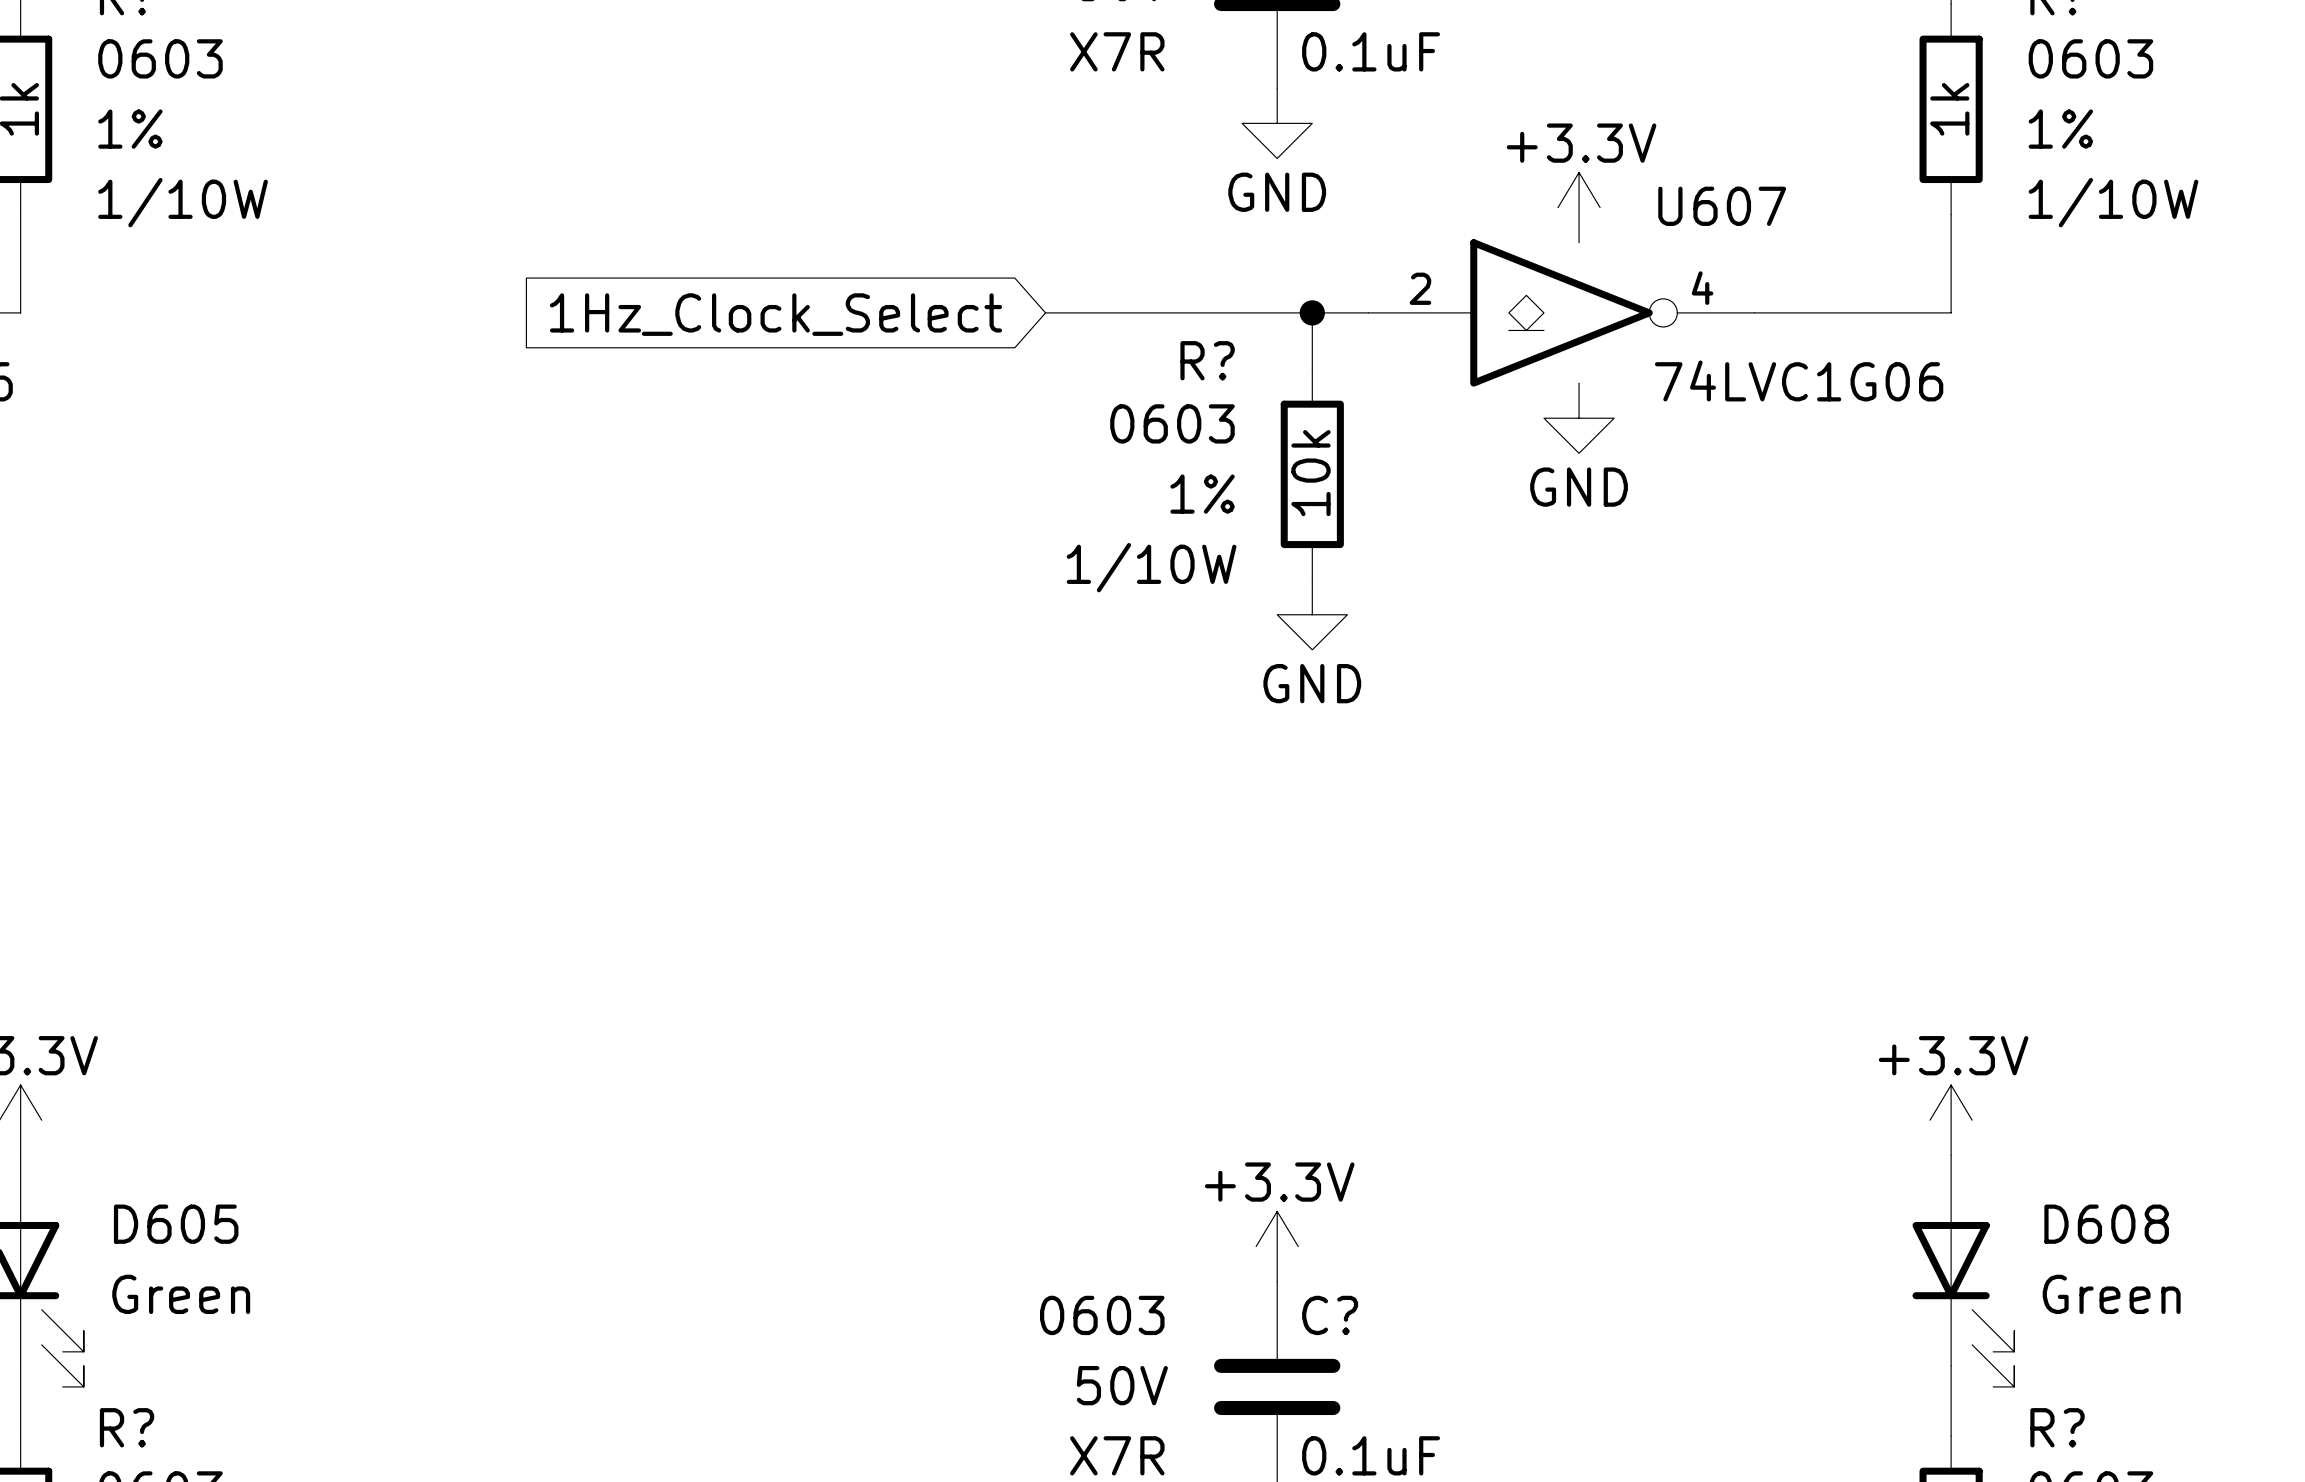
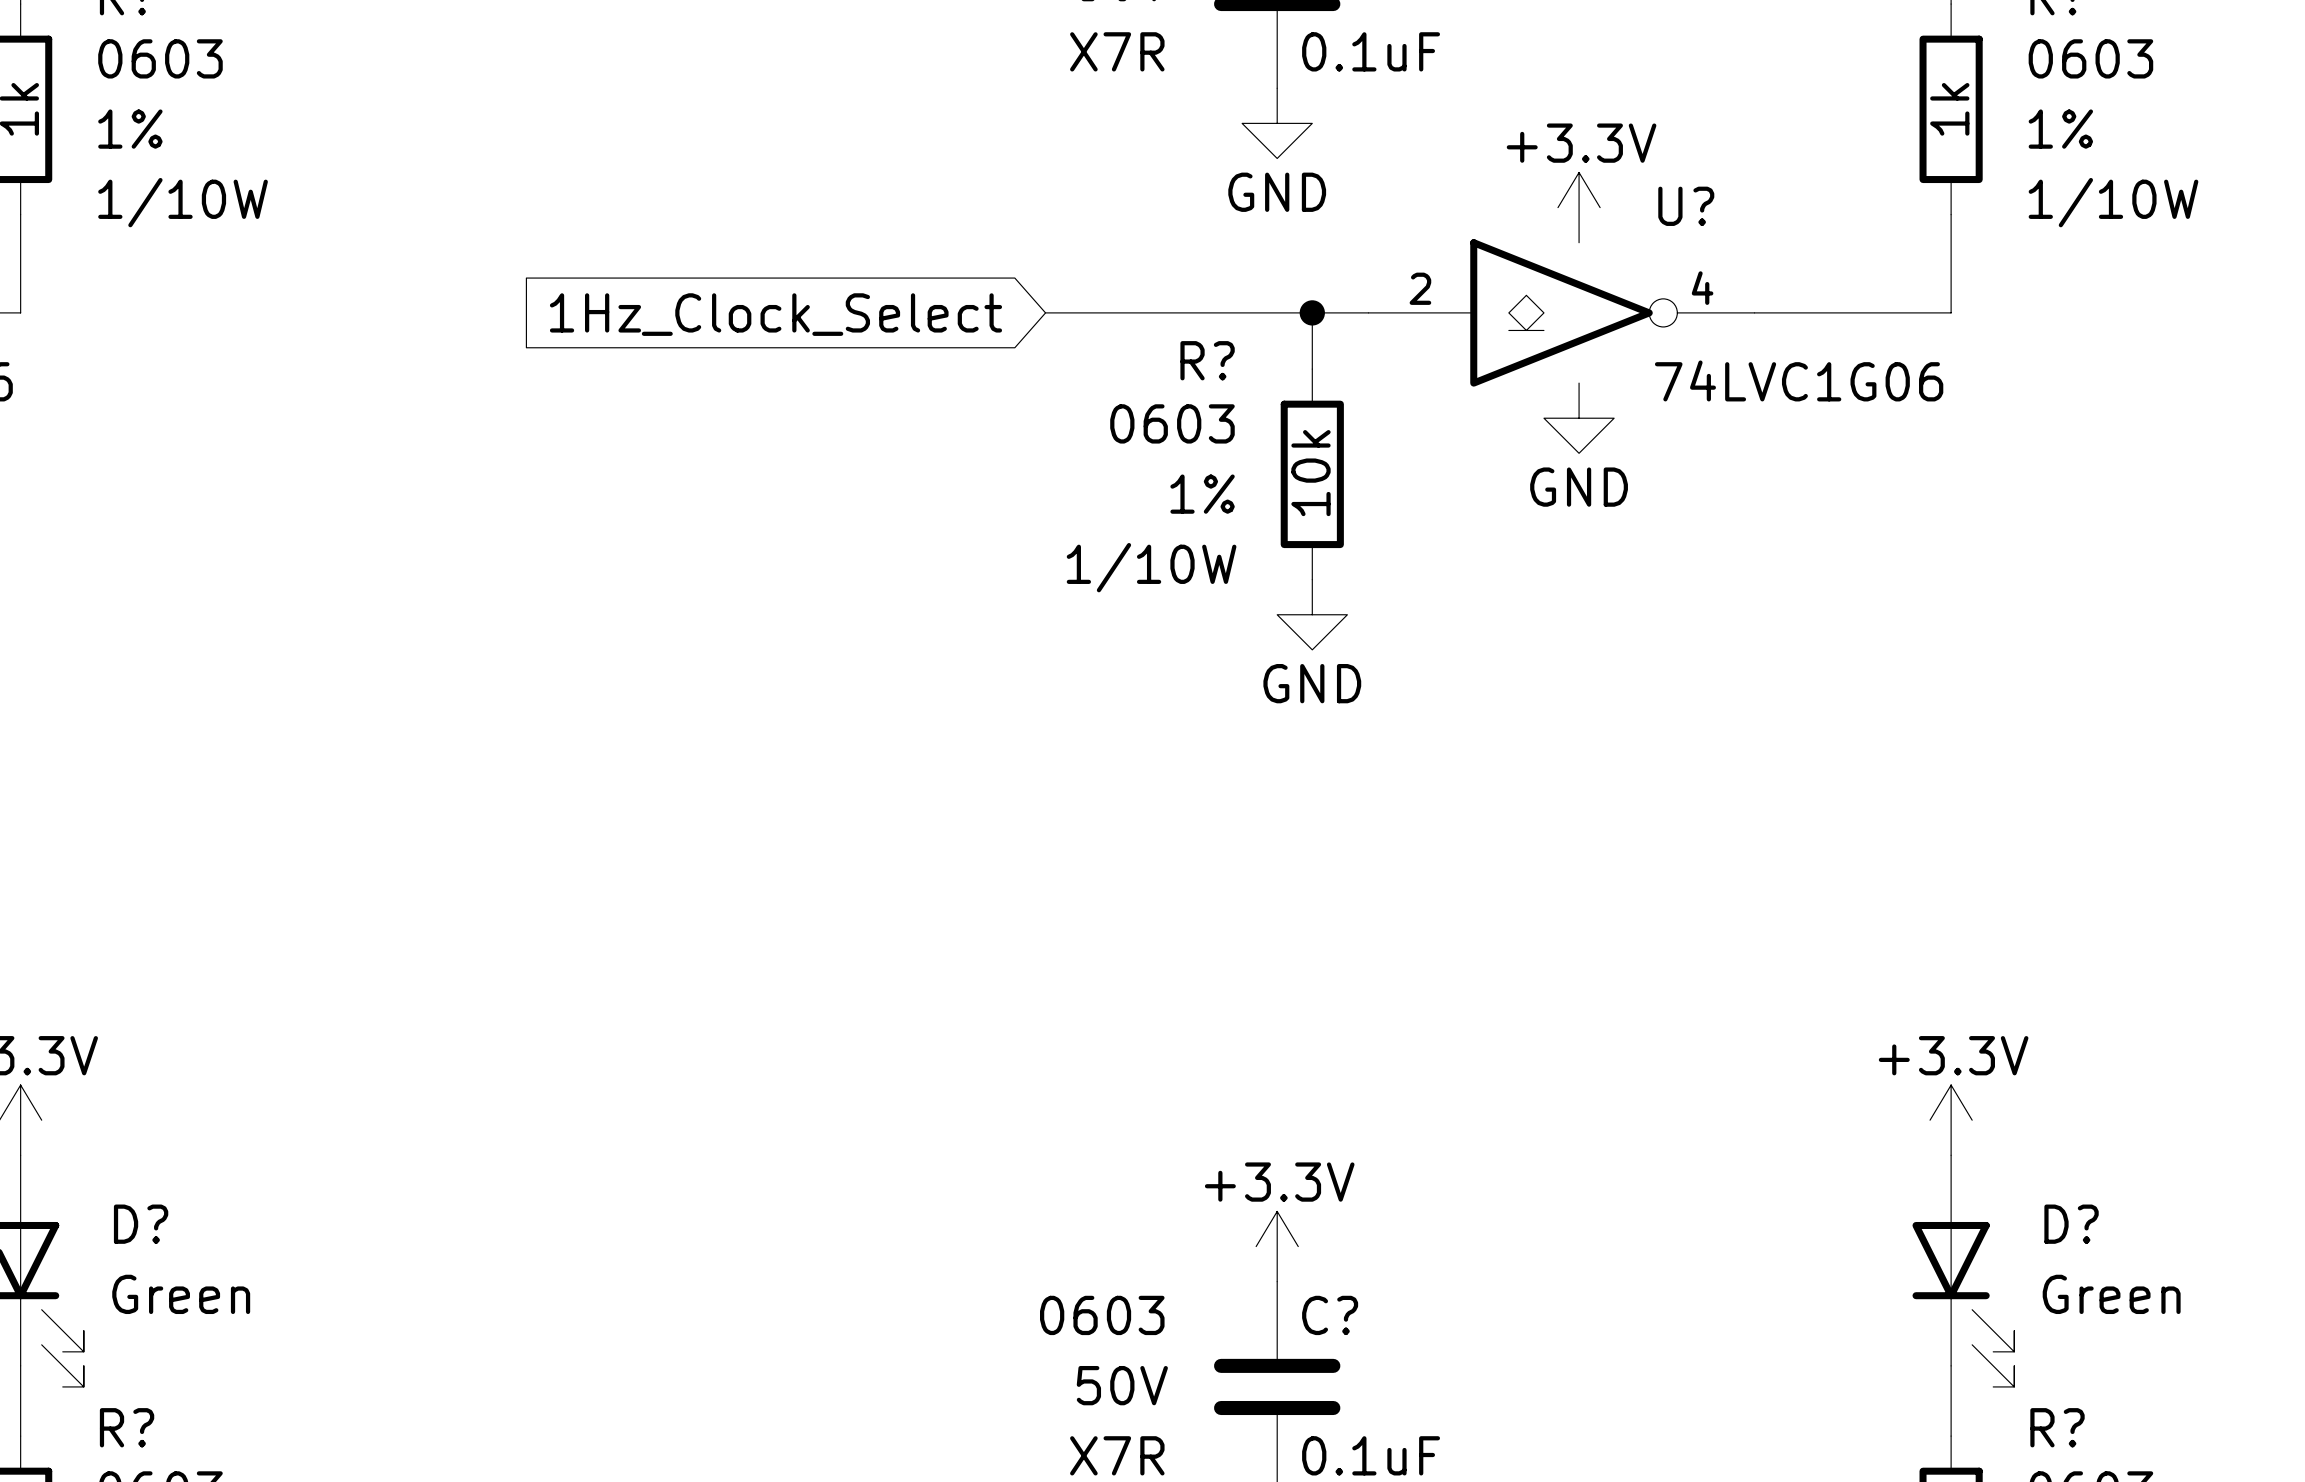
U607 name: U607 (1722, 206) -> U? (1686, 206)
D605 name: D605 (176, 1224) -> D? (141, 1224)
D608 name: D608 (2106, 1224) -> D? (2071, 1224)

